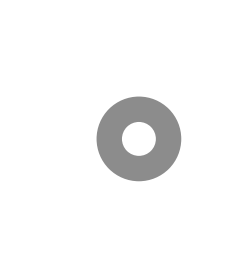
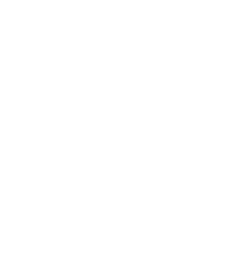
part: (138, 138) -> none

